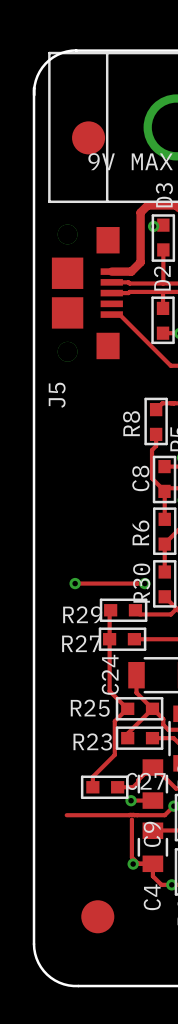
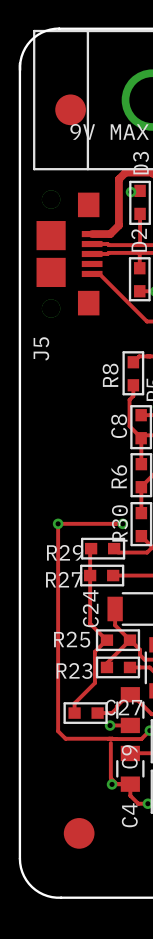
track: (66, 815) (129, 815) -> (58, 523) (58, 731) (65, 738) (109, 738)

